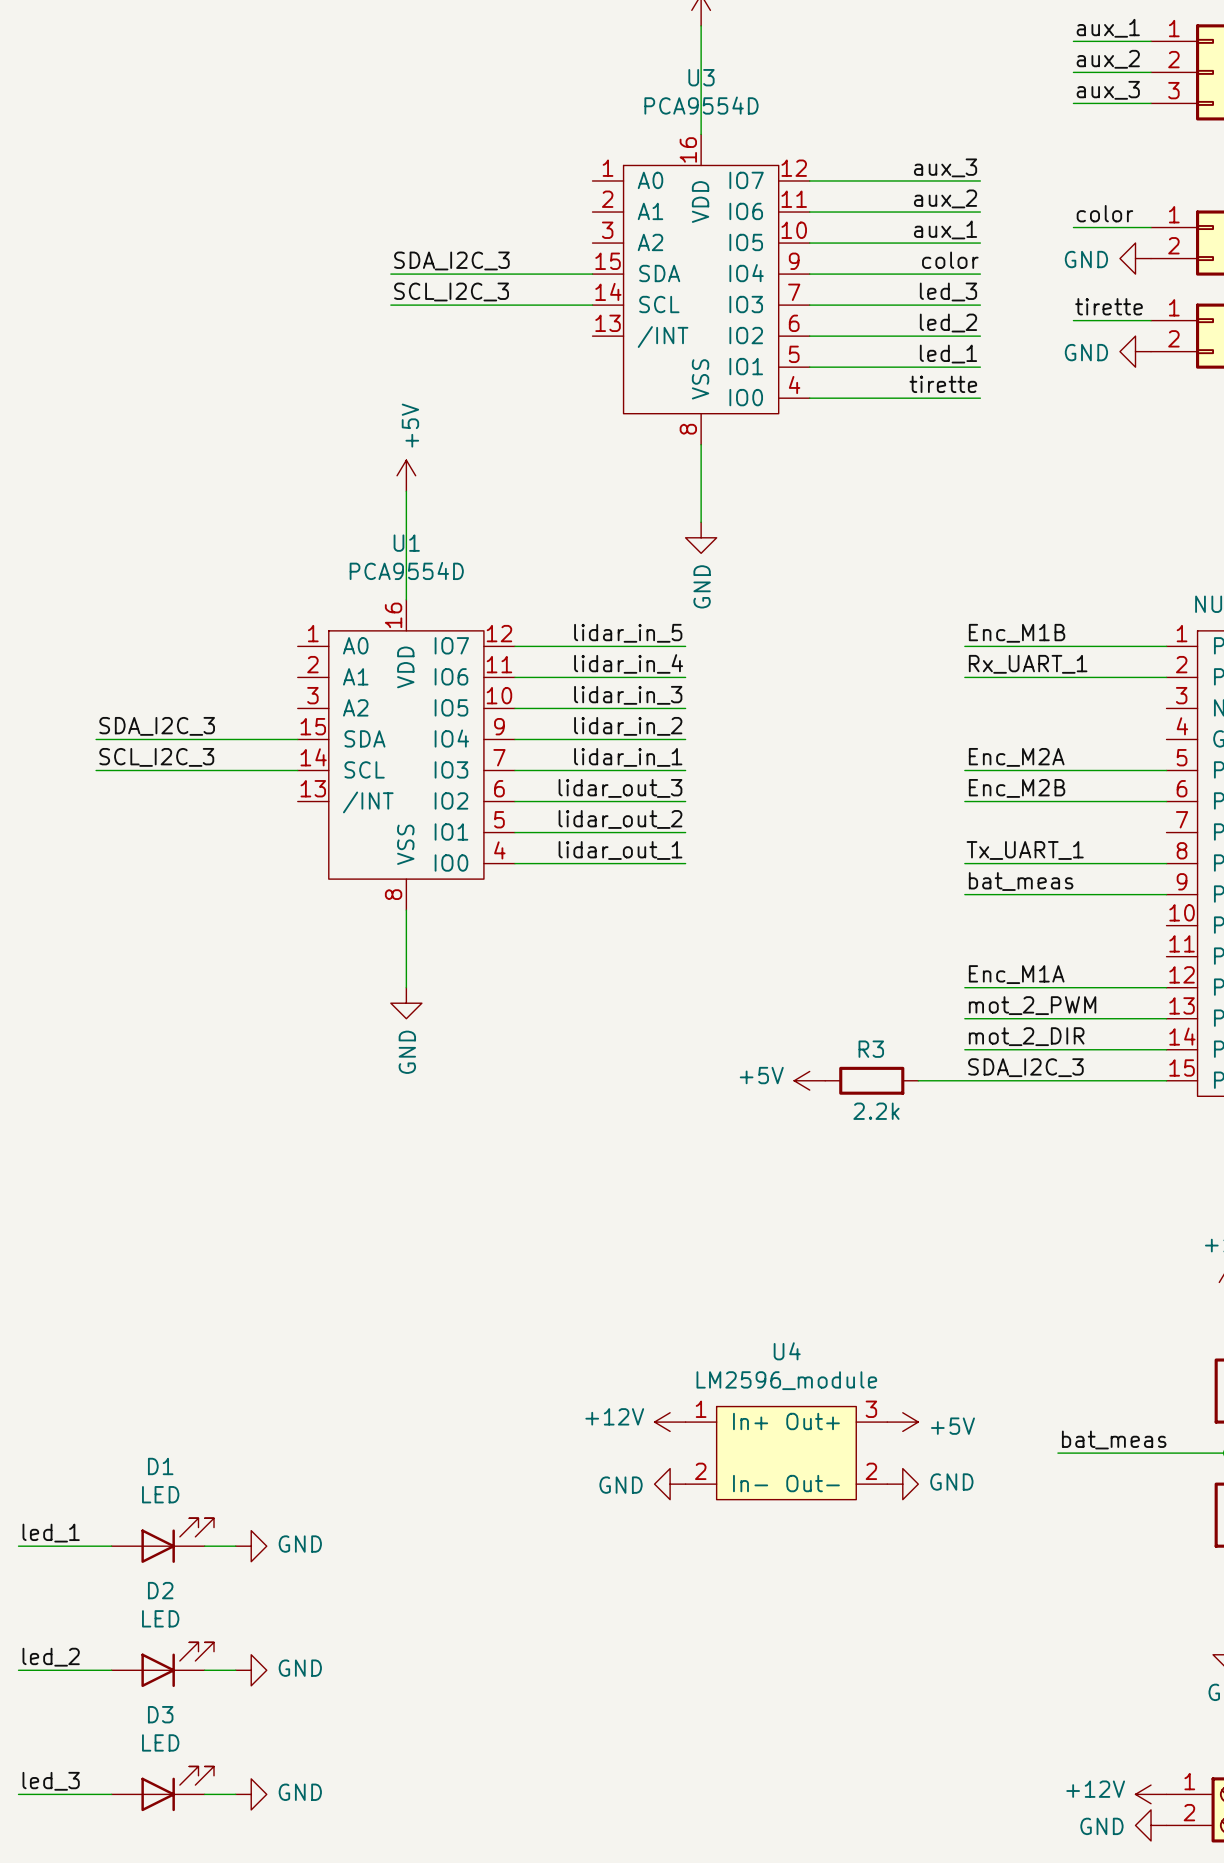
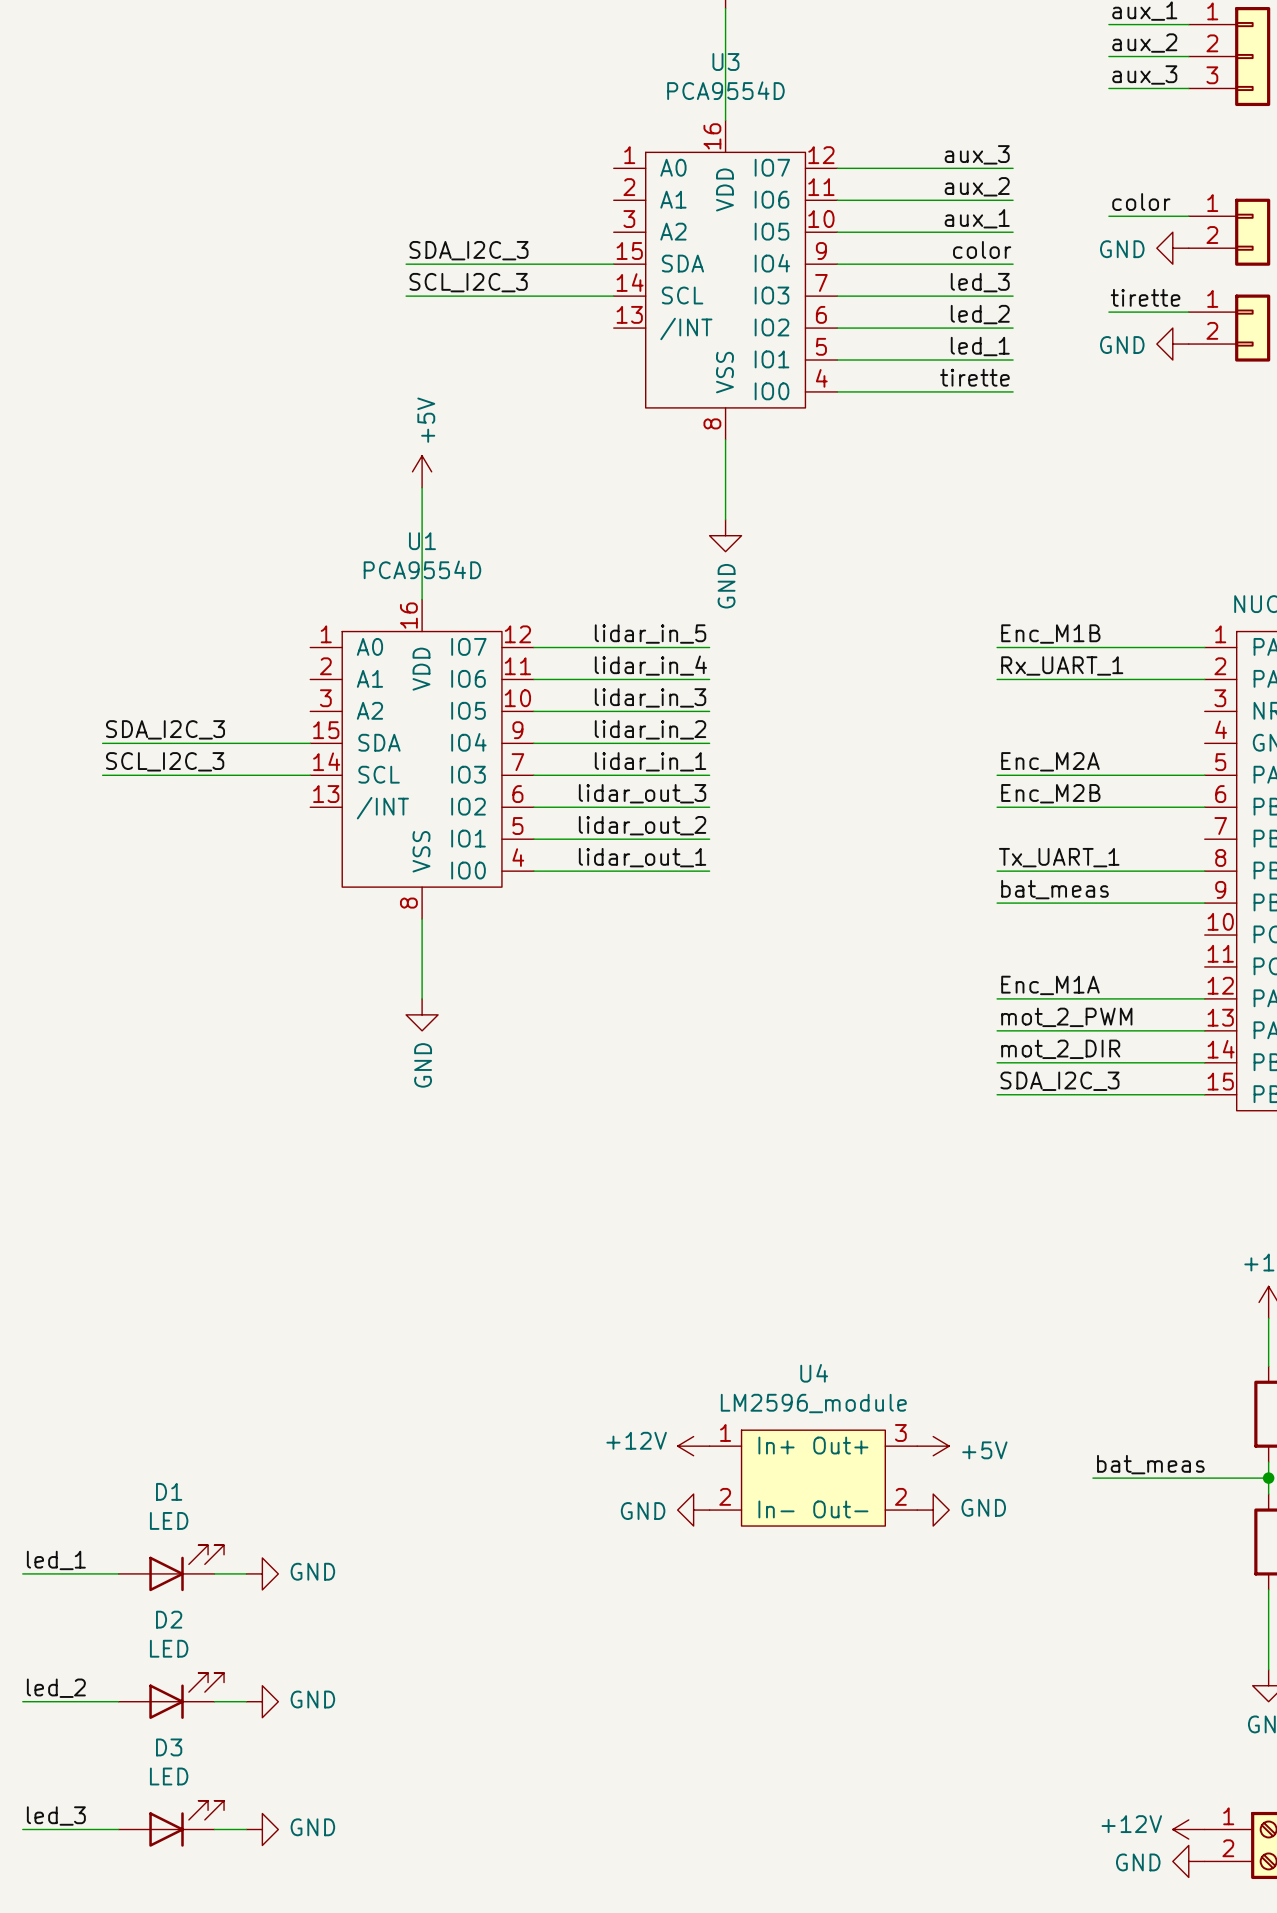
power symbol: +5V (809, 1080) -> none
R3: 2.2k (871, 1080) -> none
wire: (918, 1080) (964, 1080) -> none

